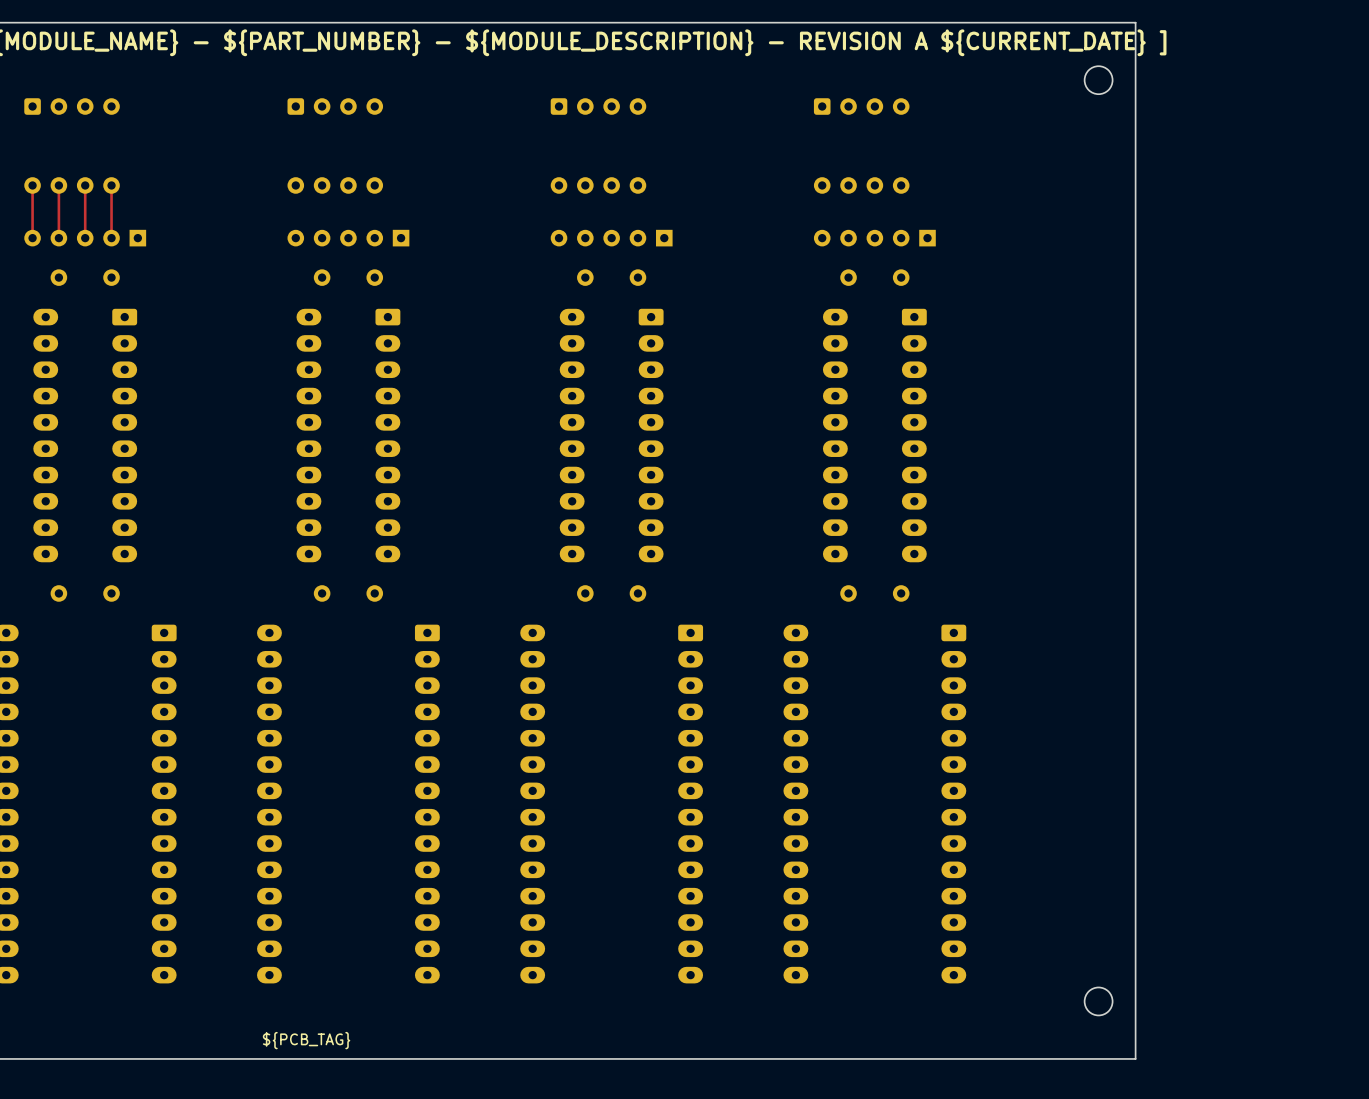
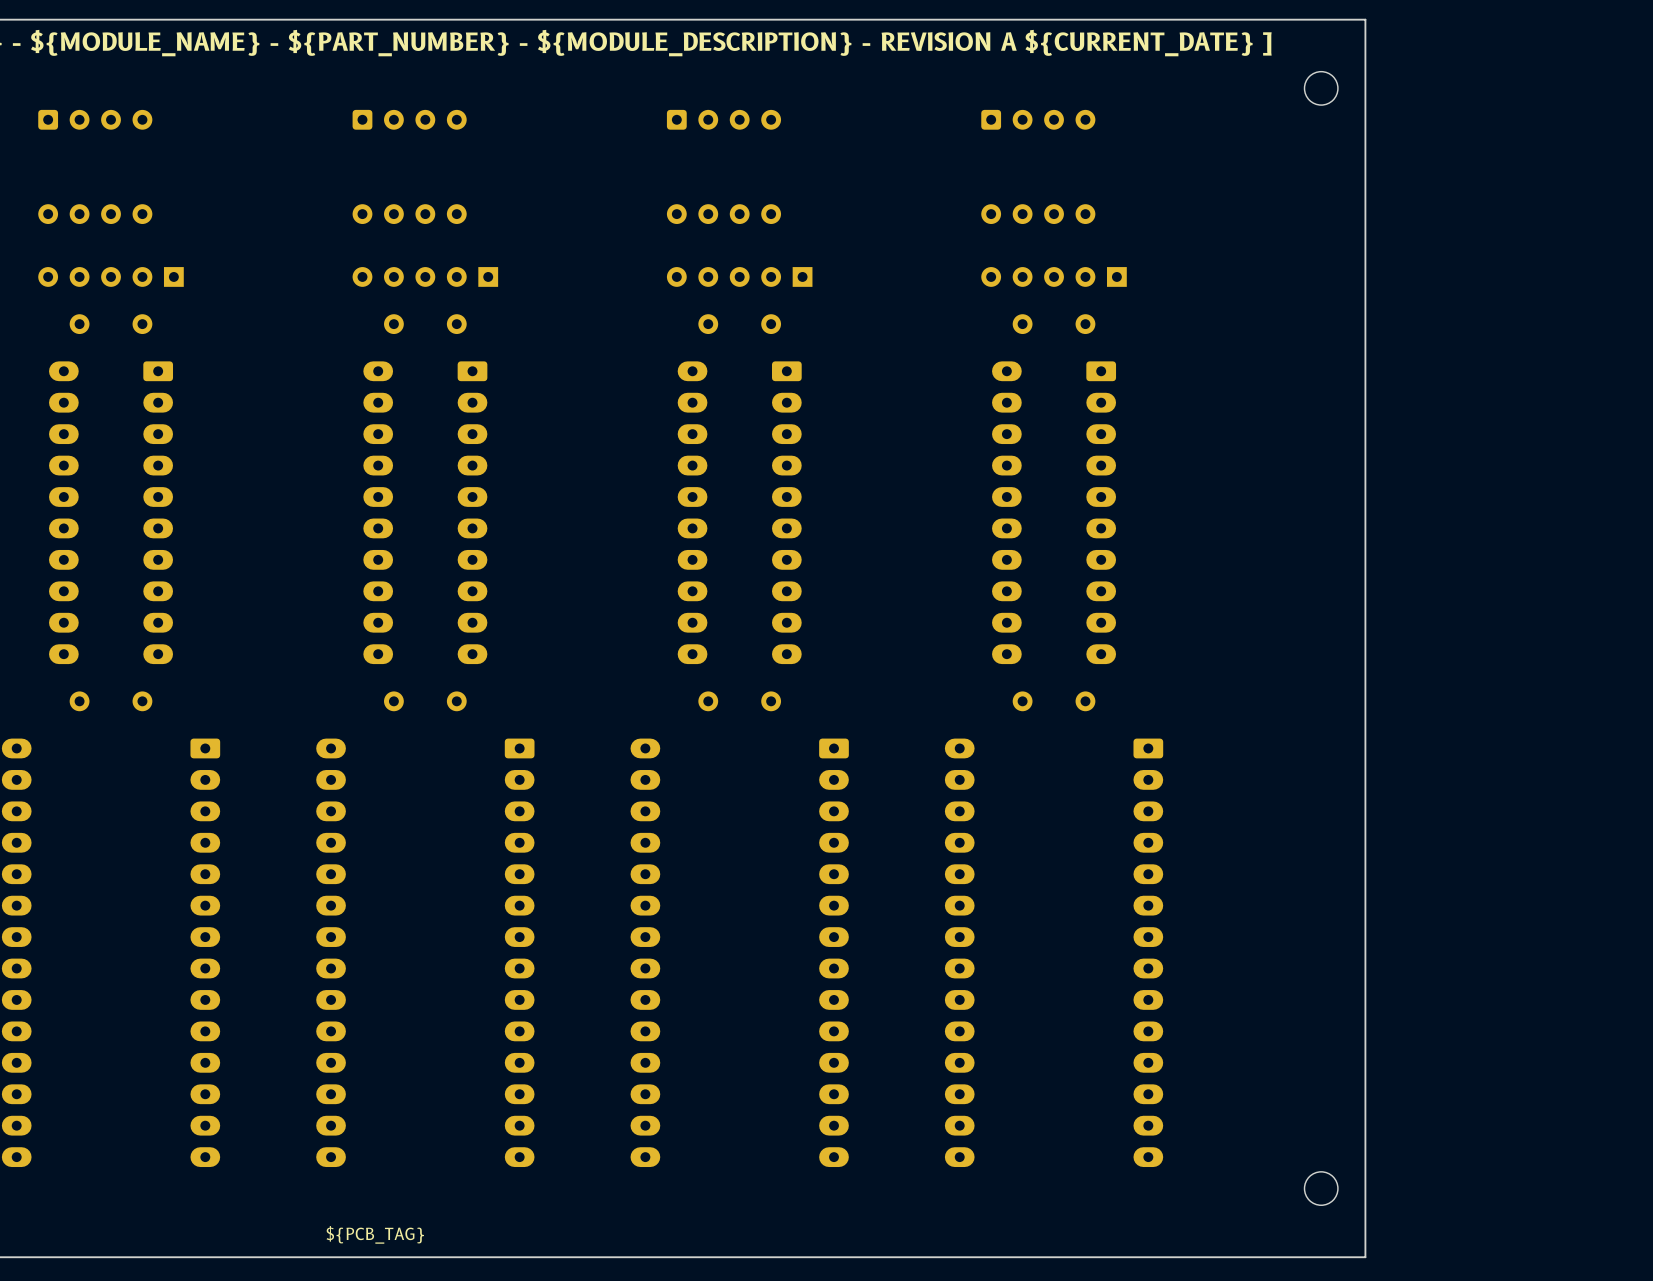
top track: (32, 185) (32, 238) -> none
top track: (58, 185) (58, 238) -> none
top track: (85, 185) (85, 238) -> none
top track: (111, 185) (111, 238) -> none

